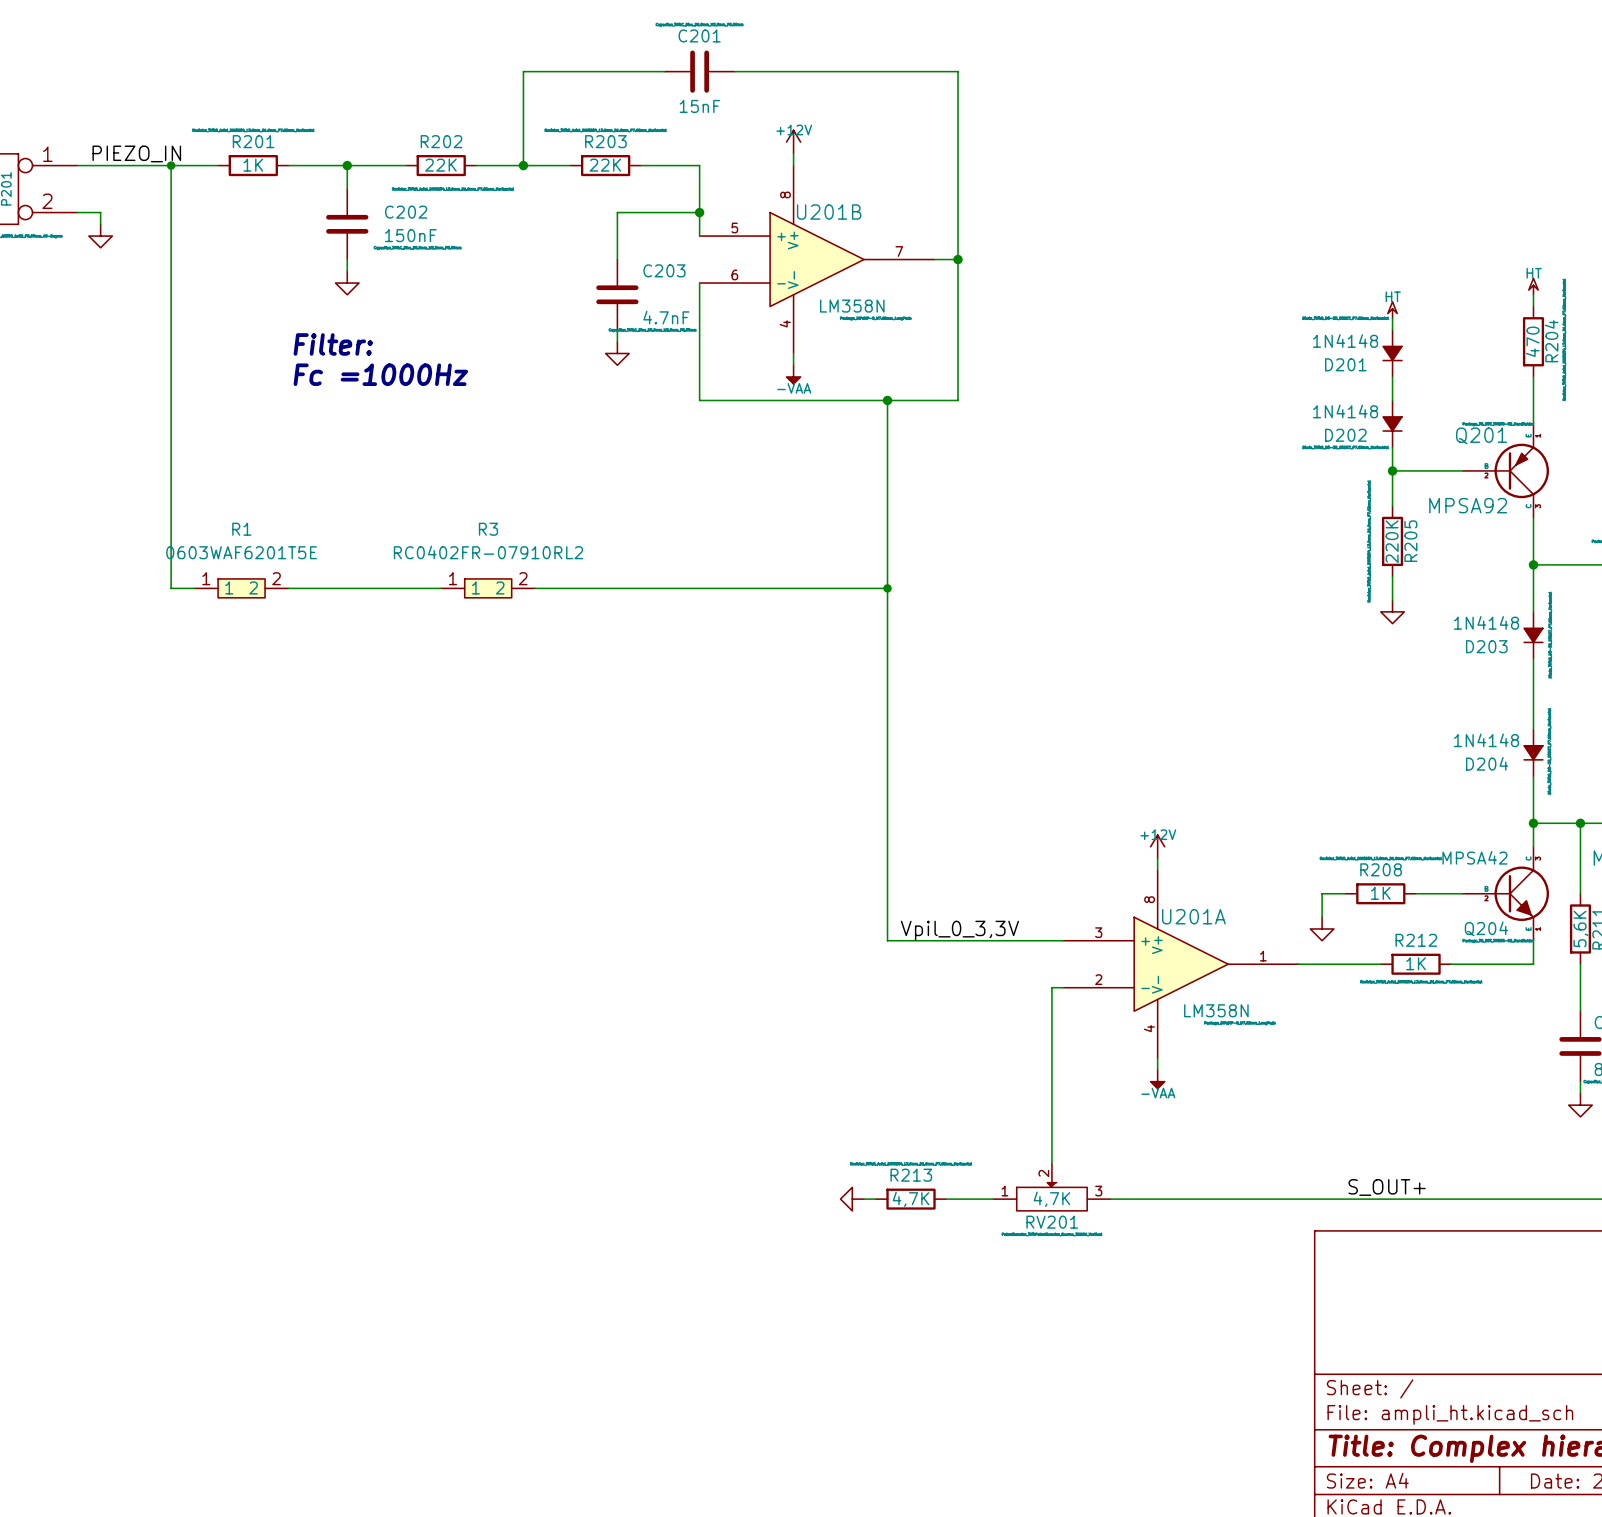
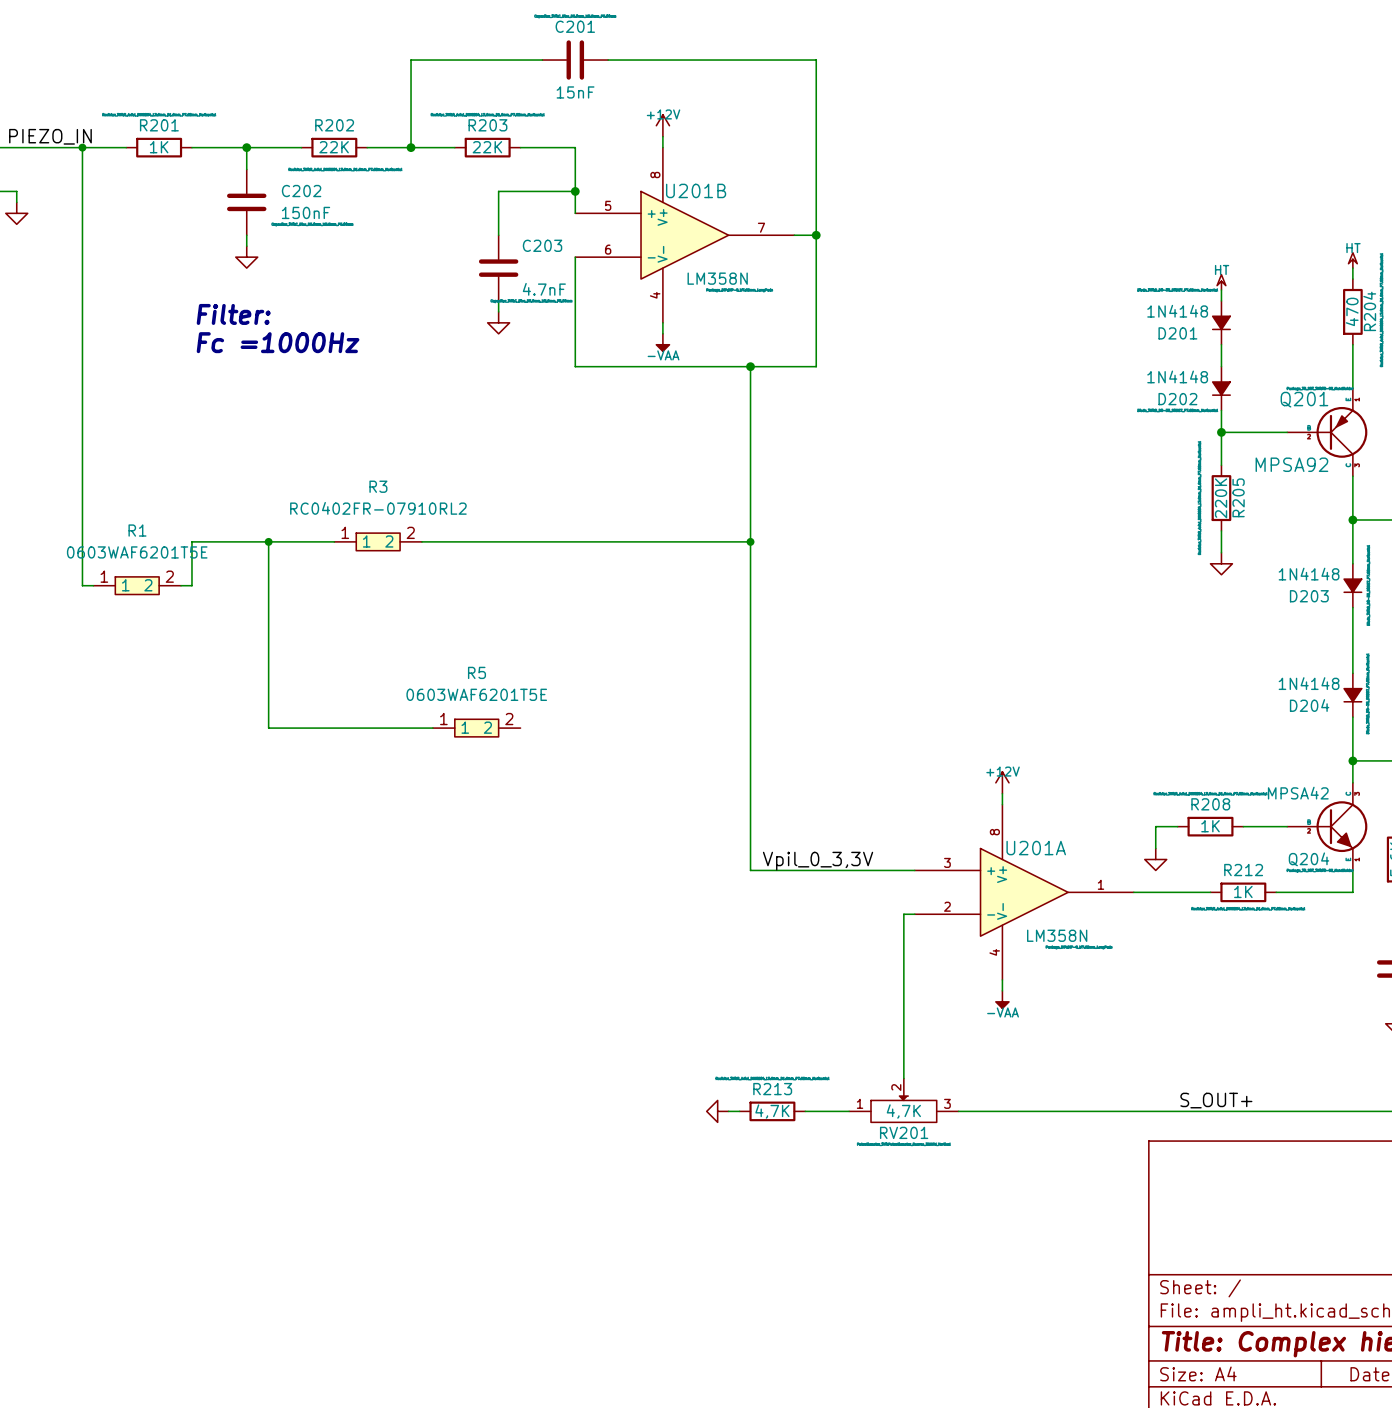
wire: (171, 588) (194, 588) -> (82, 541) (82, 585) (93, 585)
R1 position: (241, 588) -> (137, 585)
wire: none -> (191, 541) (191, 585) (181, 585)
wire: none -> (268, 541) (268, 728) (432, 728)
junction: none -> (268, 541)
R5: none -> 0603WAF6201T5E (476, 728)

